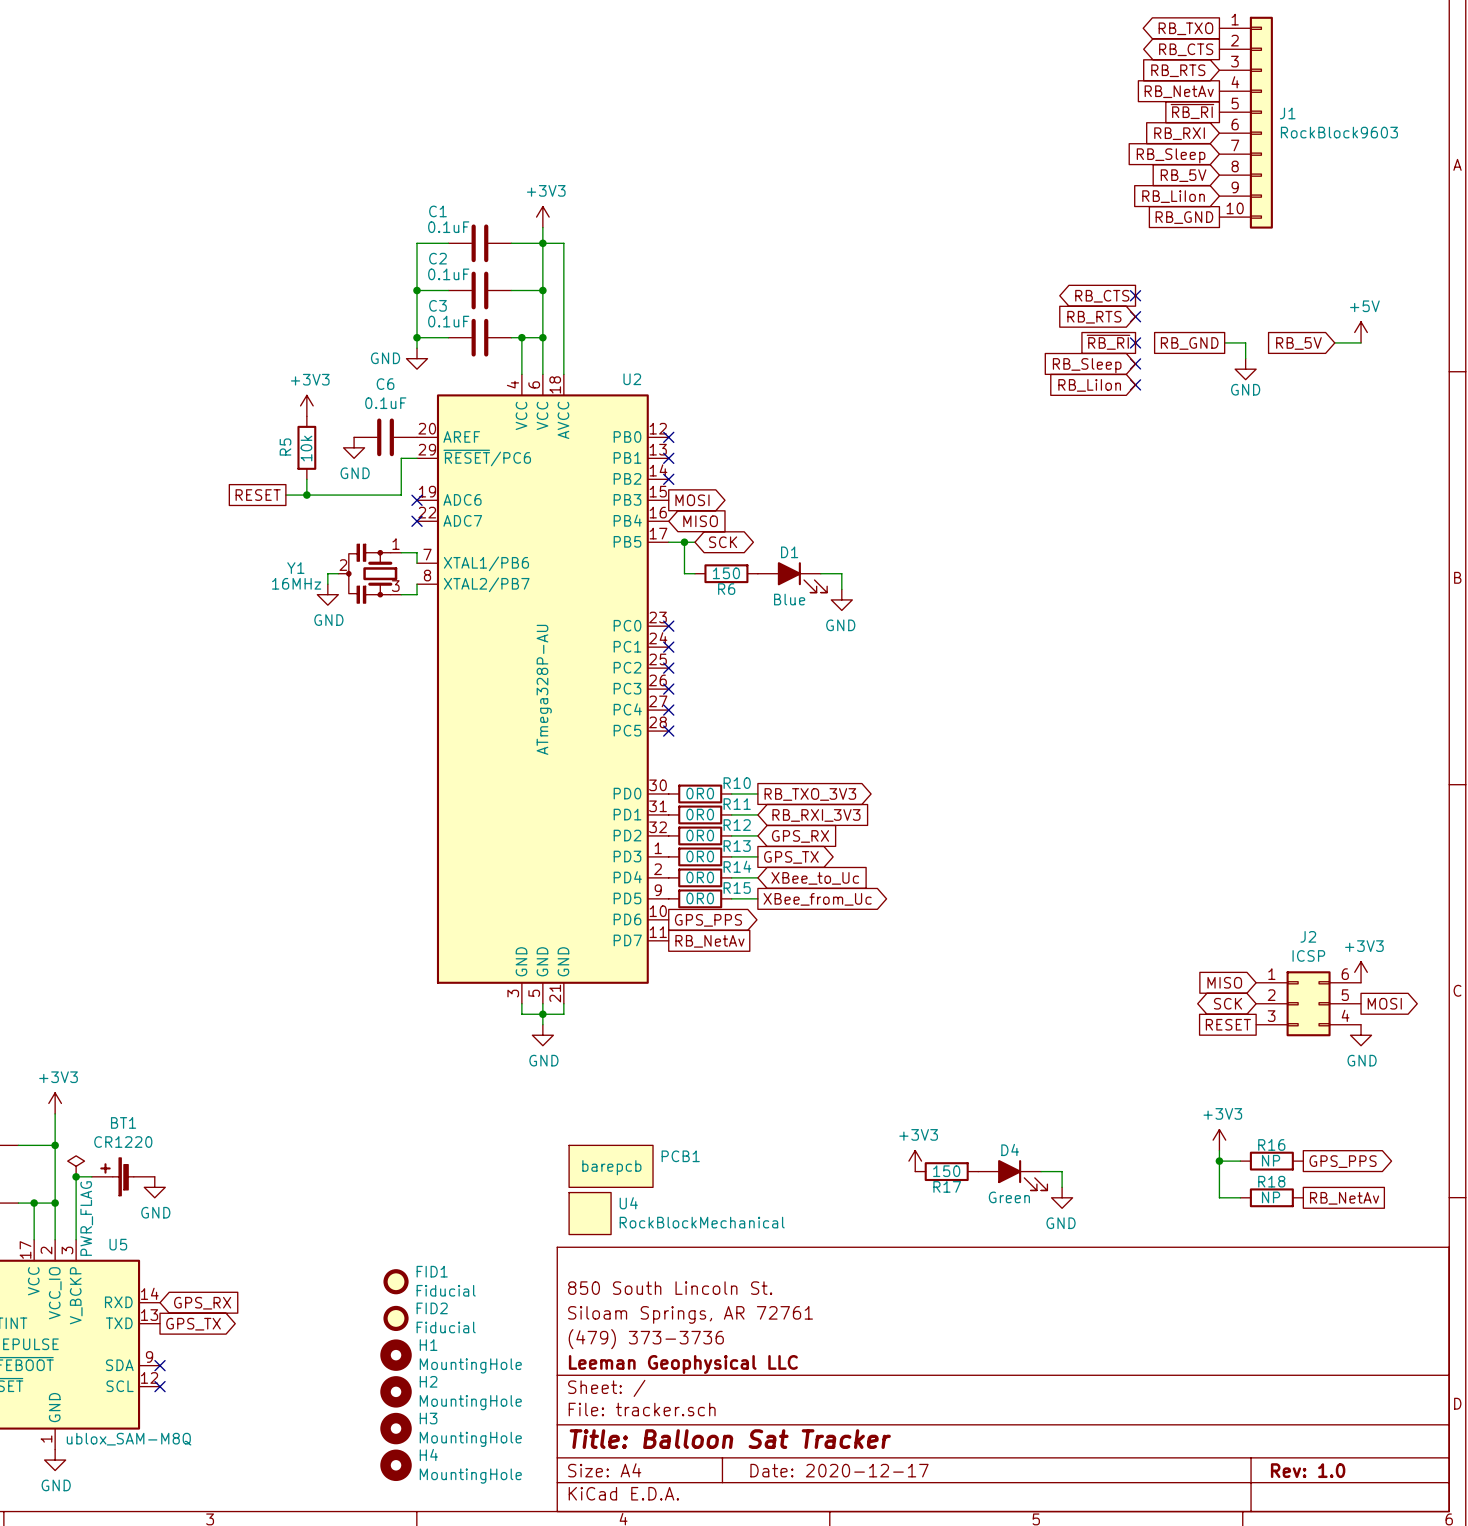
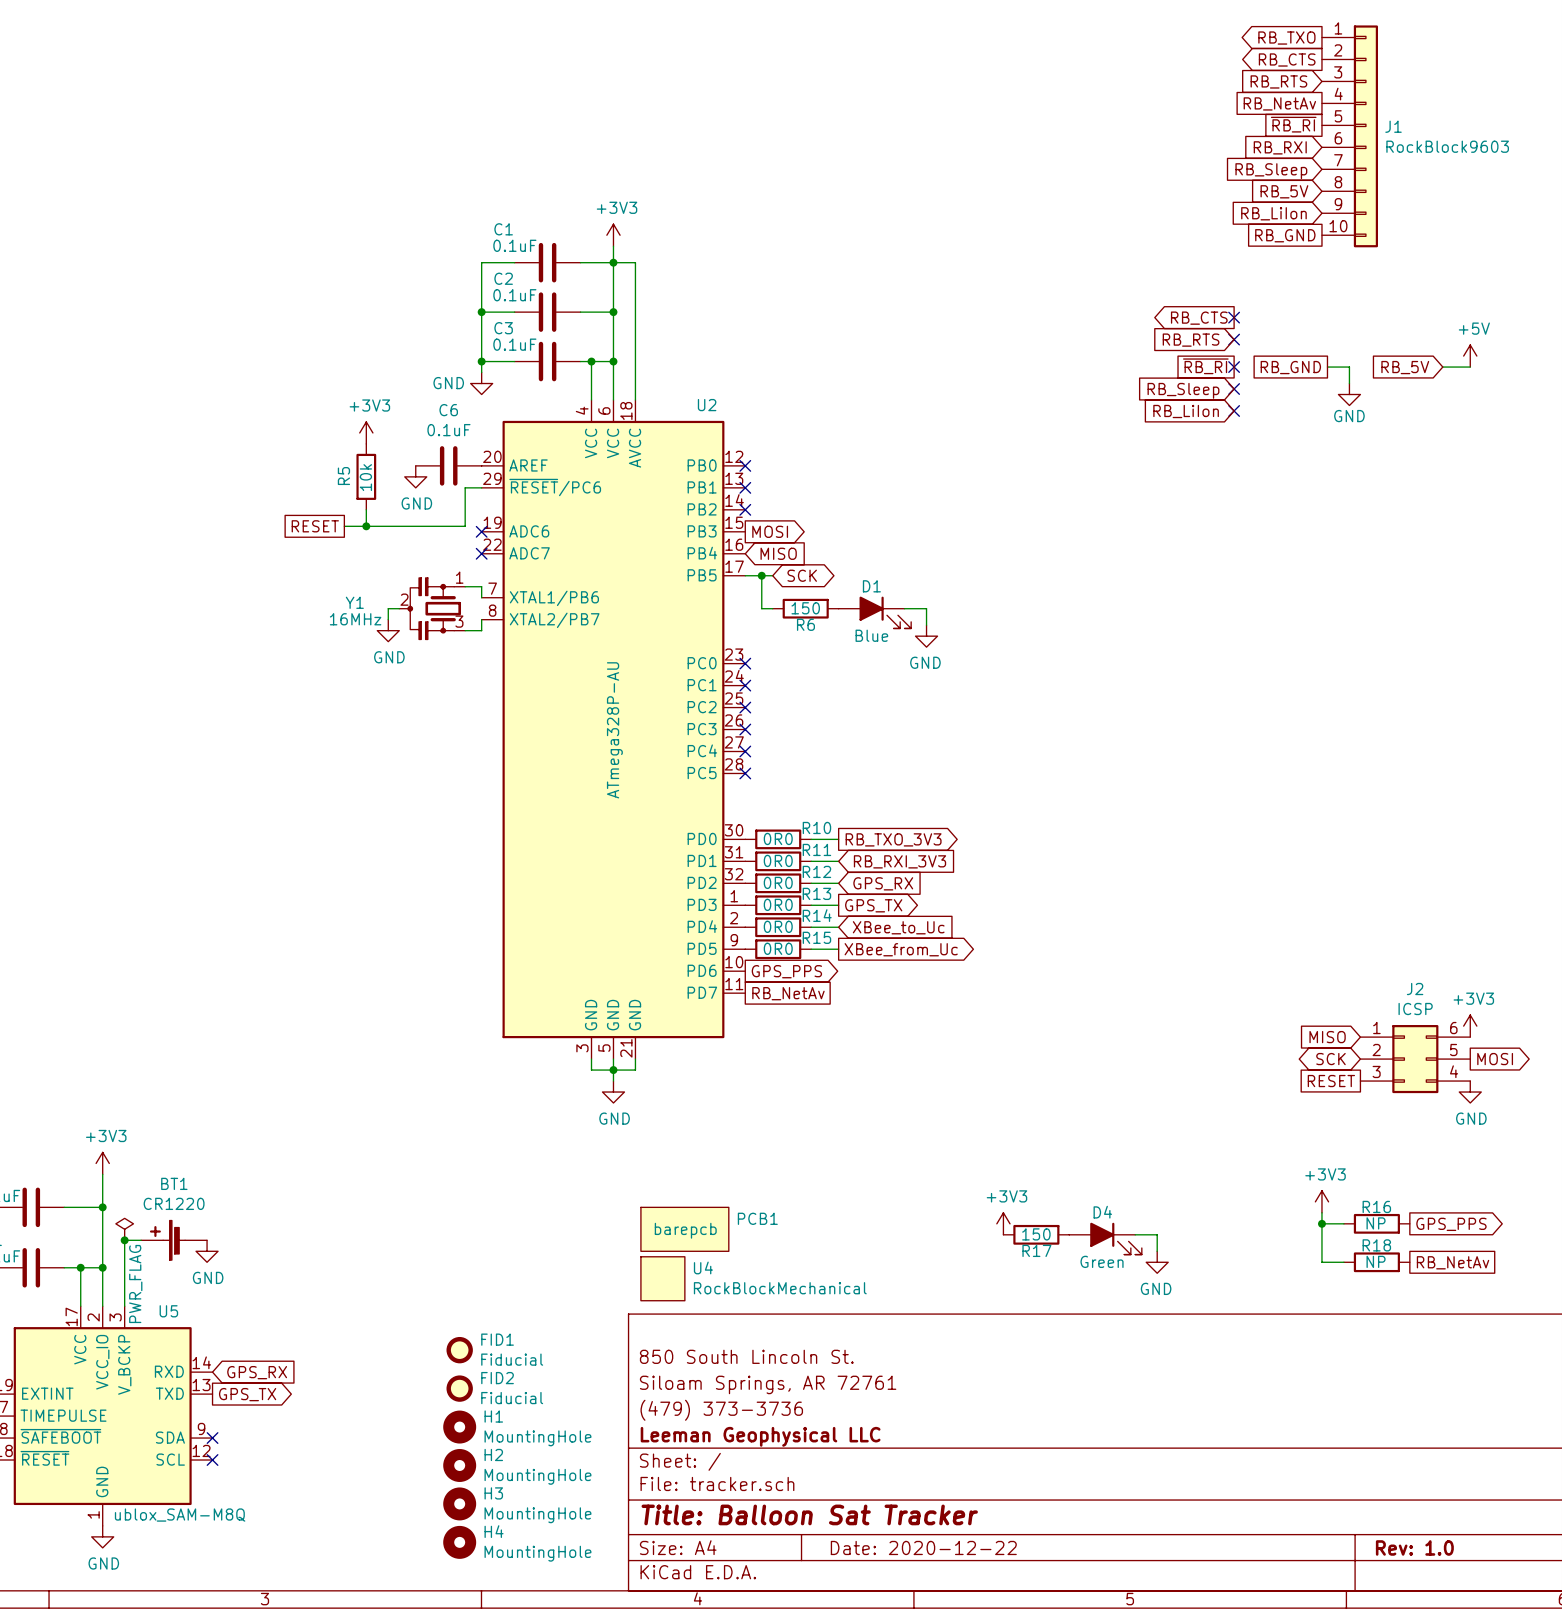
title block: Date: 2020-12-17 (839, 1470) -> Date: 2020-12-22 (923, 1547)

